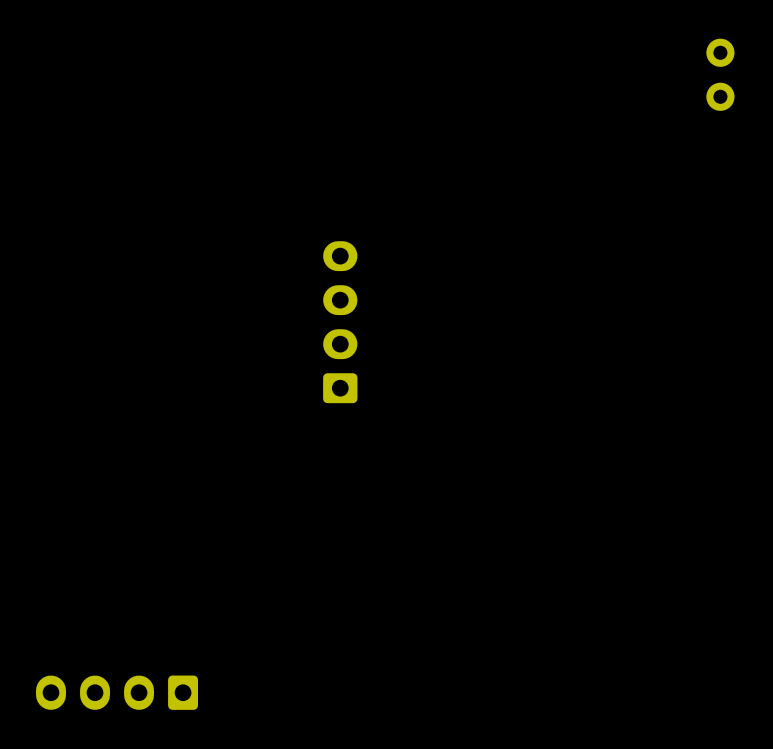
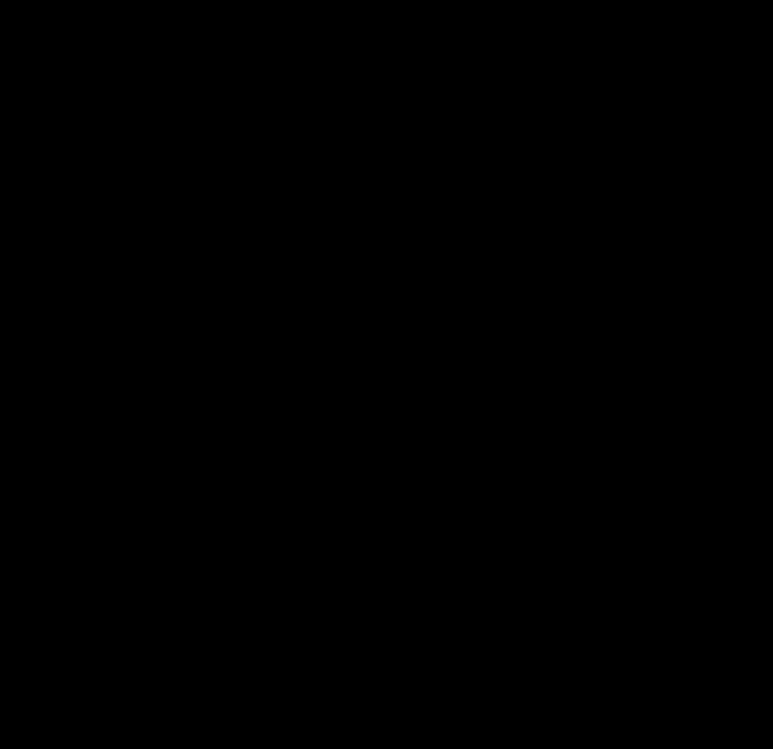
part: (720, 74) -> none
part: (340, 322) -> none
part: (117, 692) -> none

